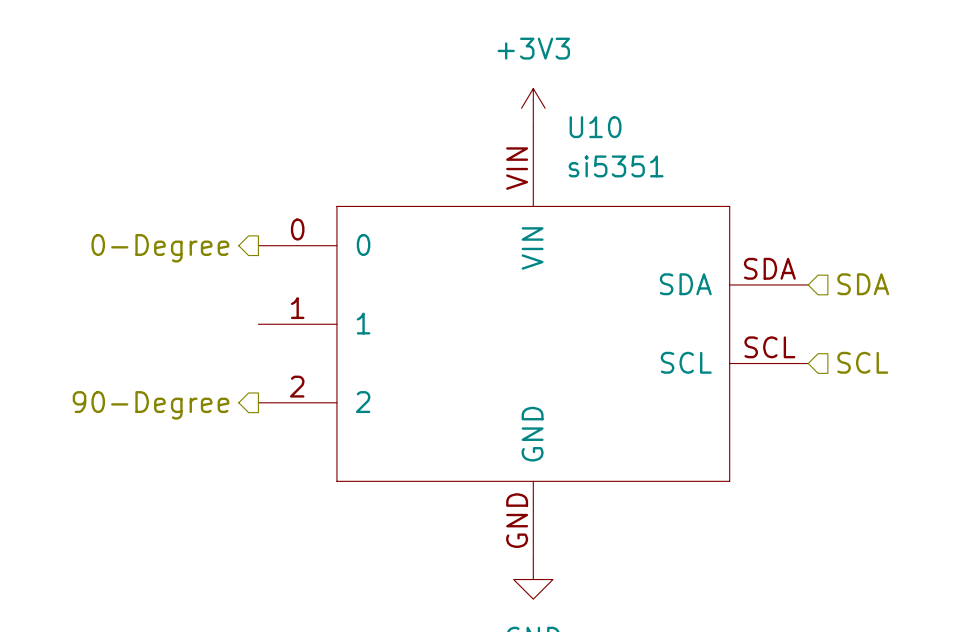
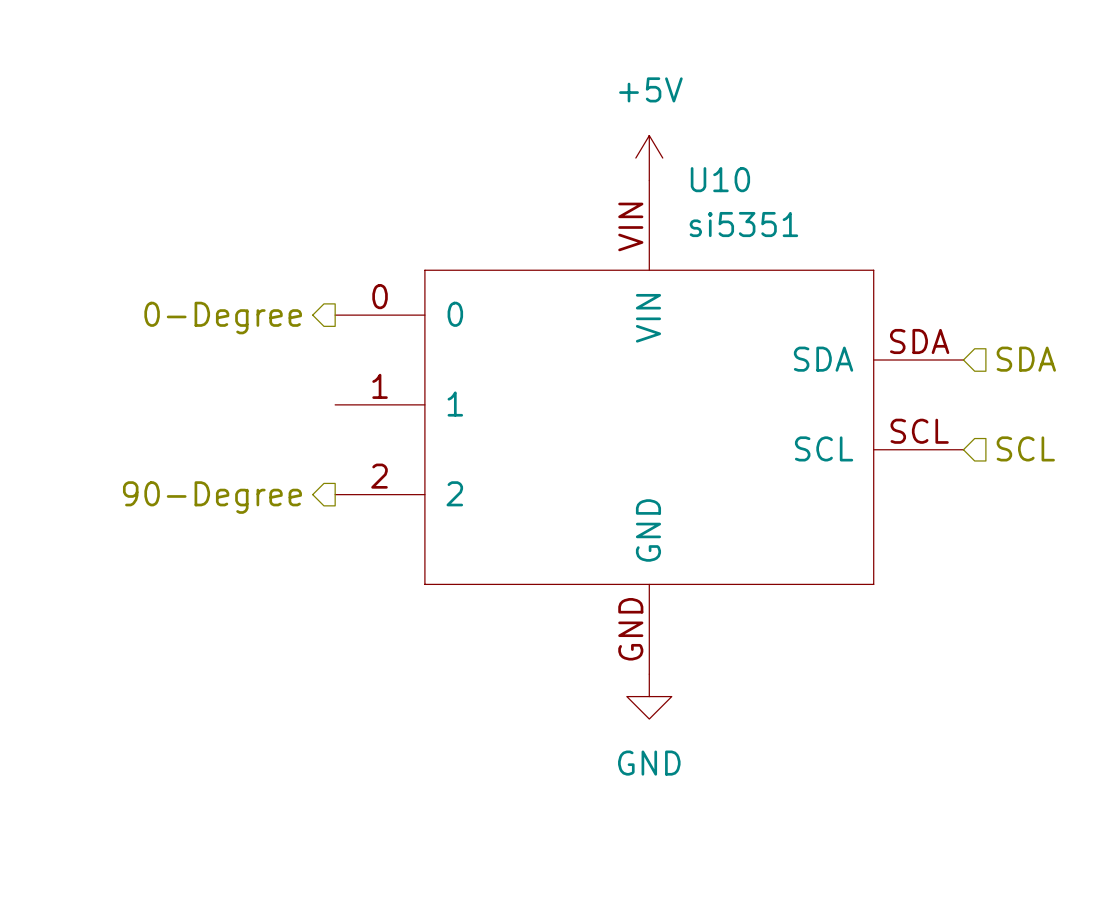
power symbol: +3V3 (533, 108) -> +5V (649, 158)

